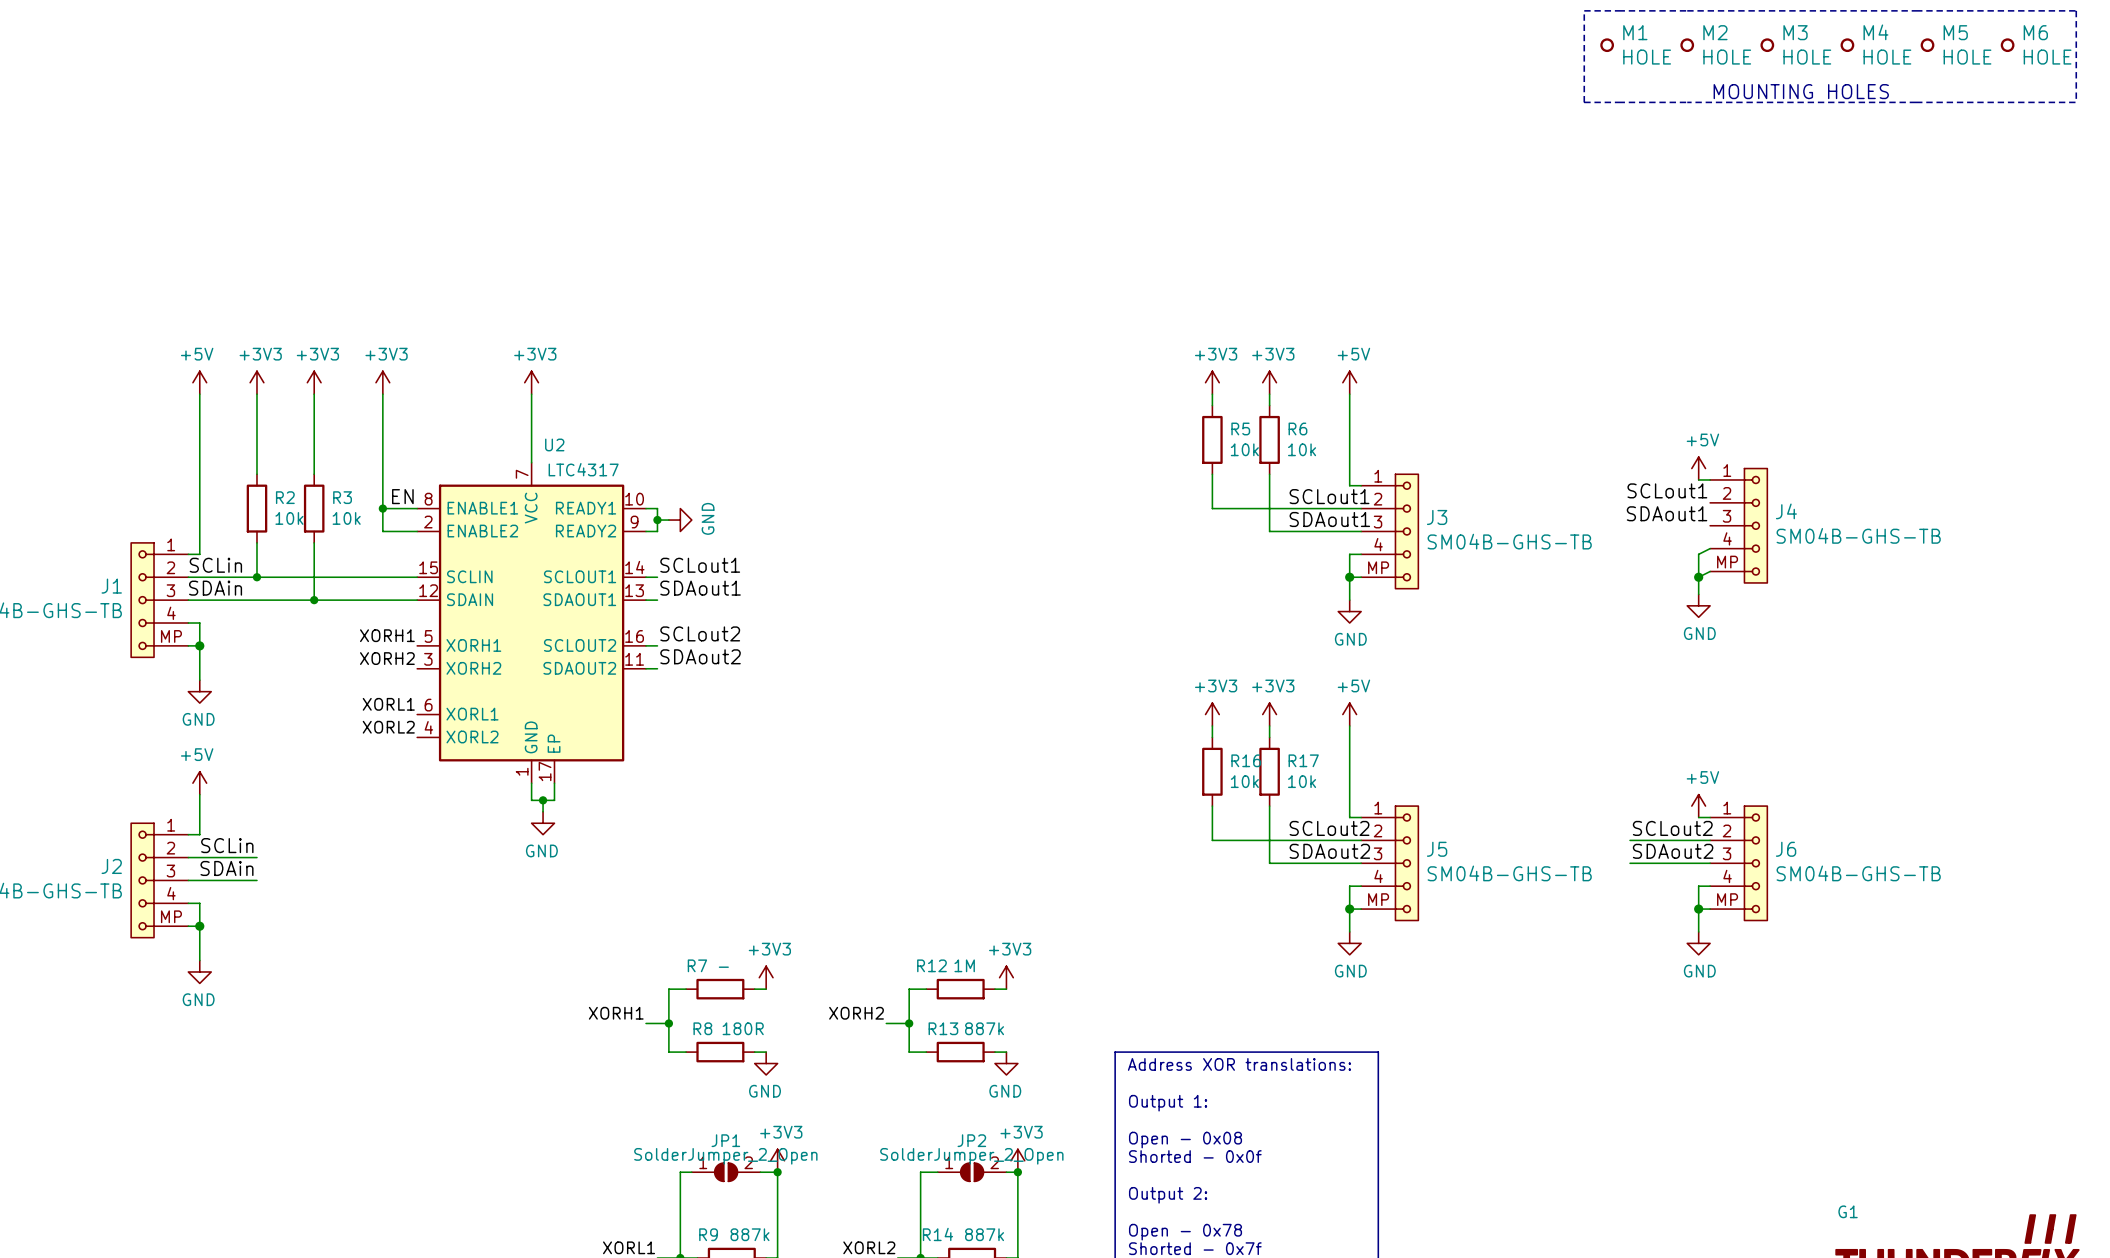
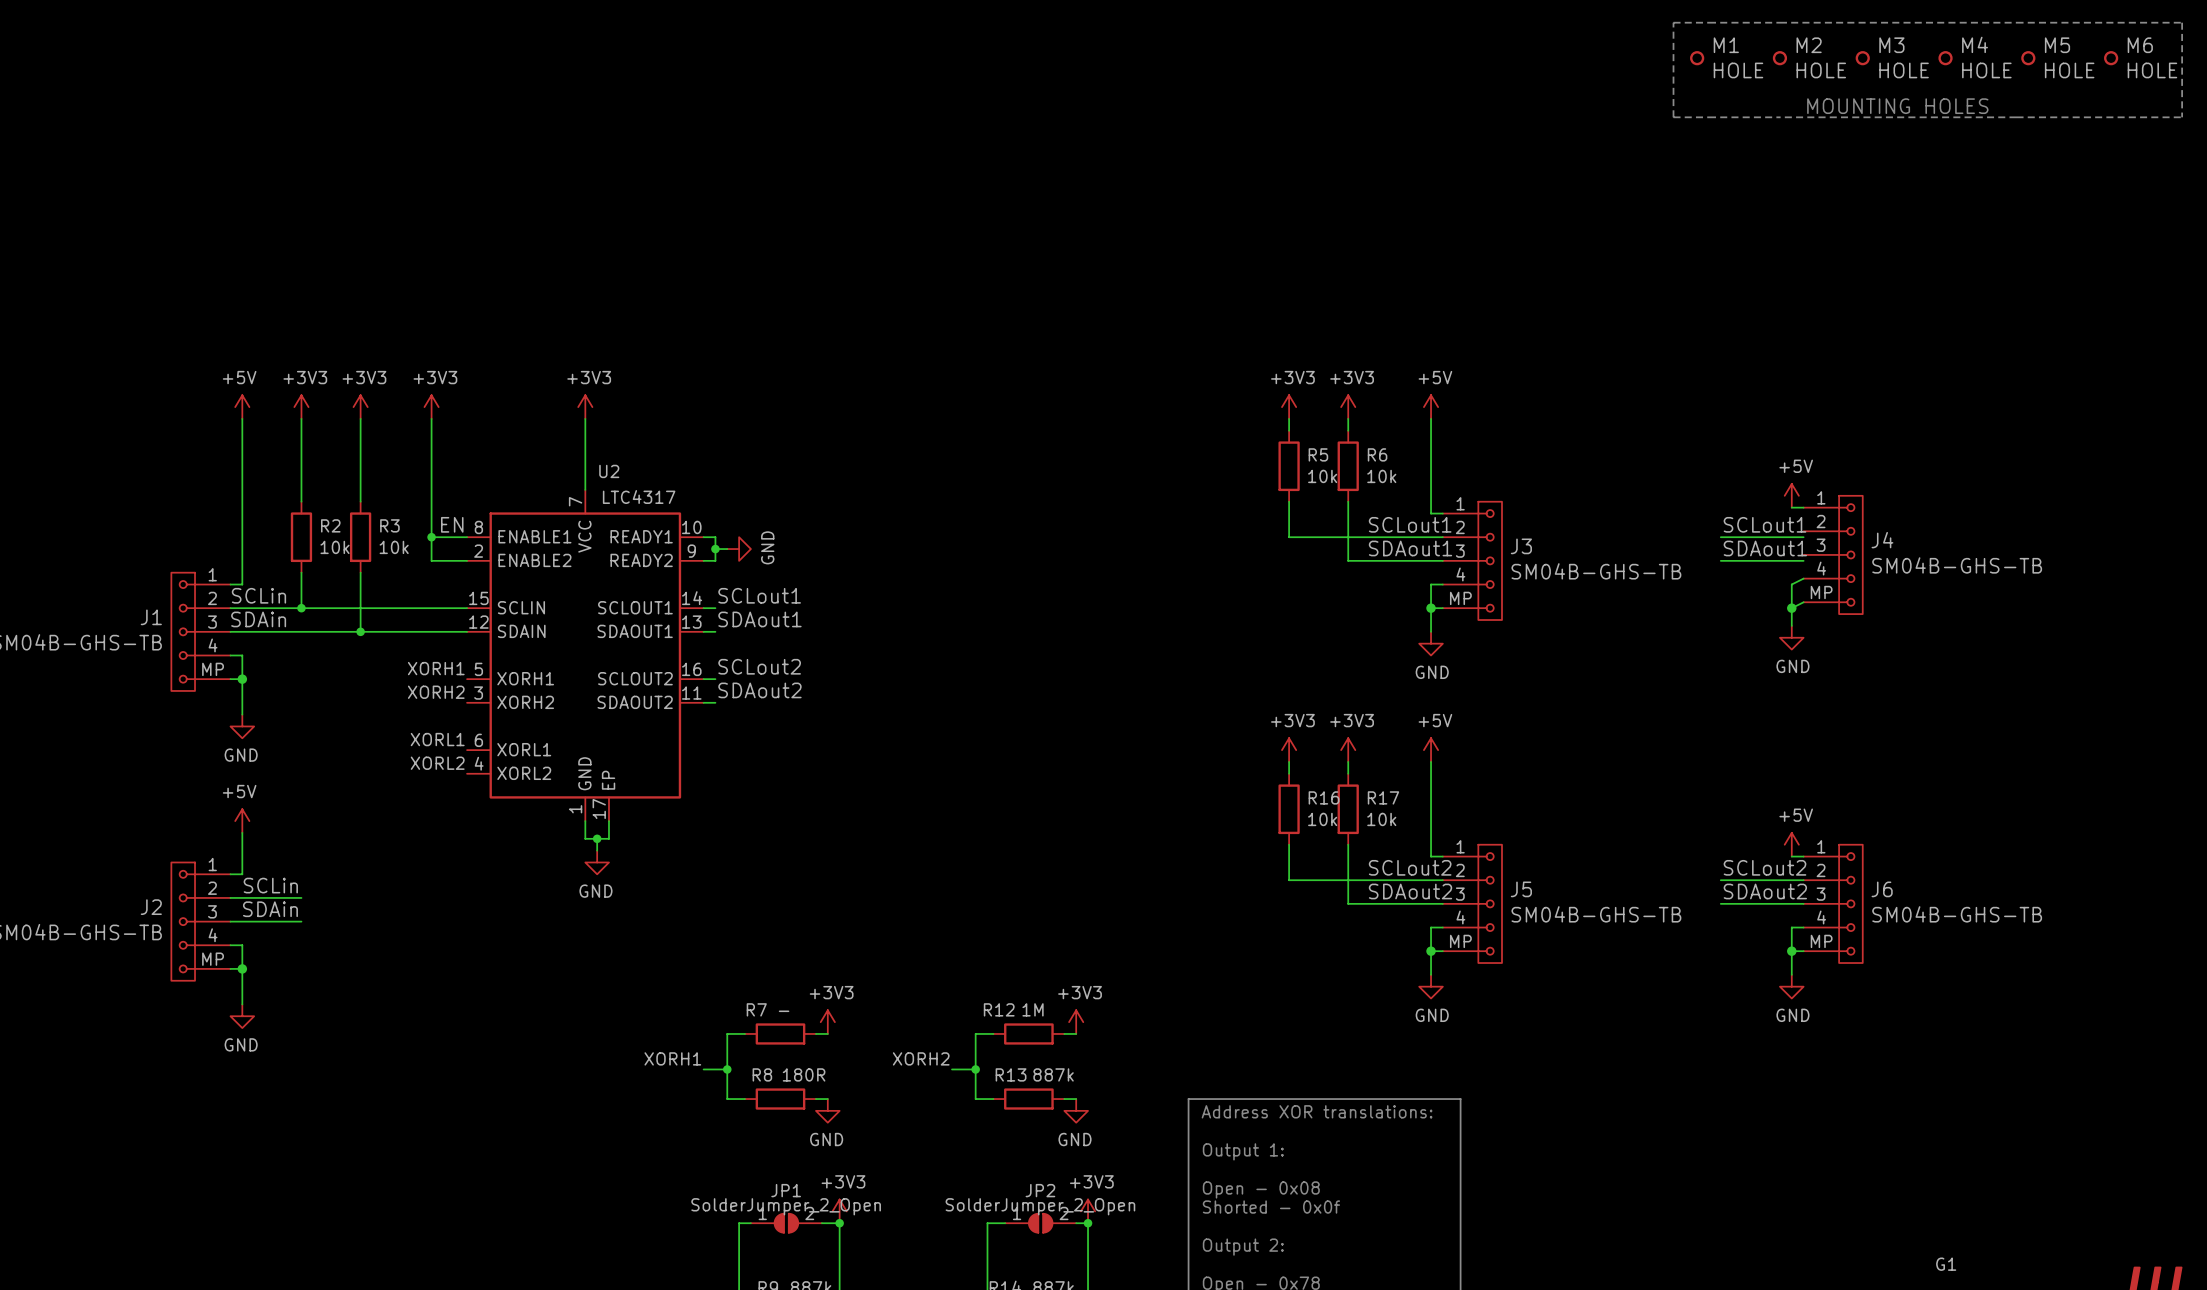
label position: SCLout1 (1667, 490) -> SCLout1 (1765, 524)
wire: none -> (1720, 537) (1803, 537)
label position: SDAout1 (1667, 513) -> SDAout1 (1765, 548)
wire: none -> (1720, 560) (1803, 560)

